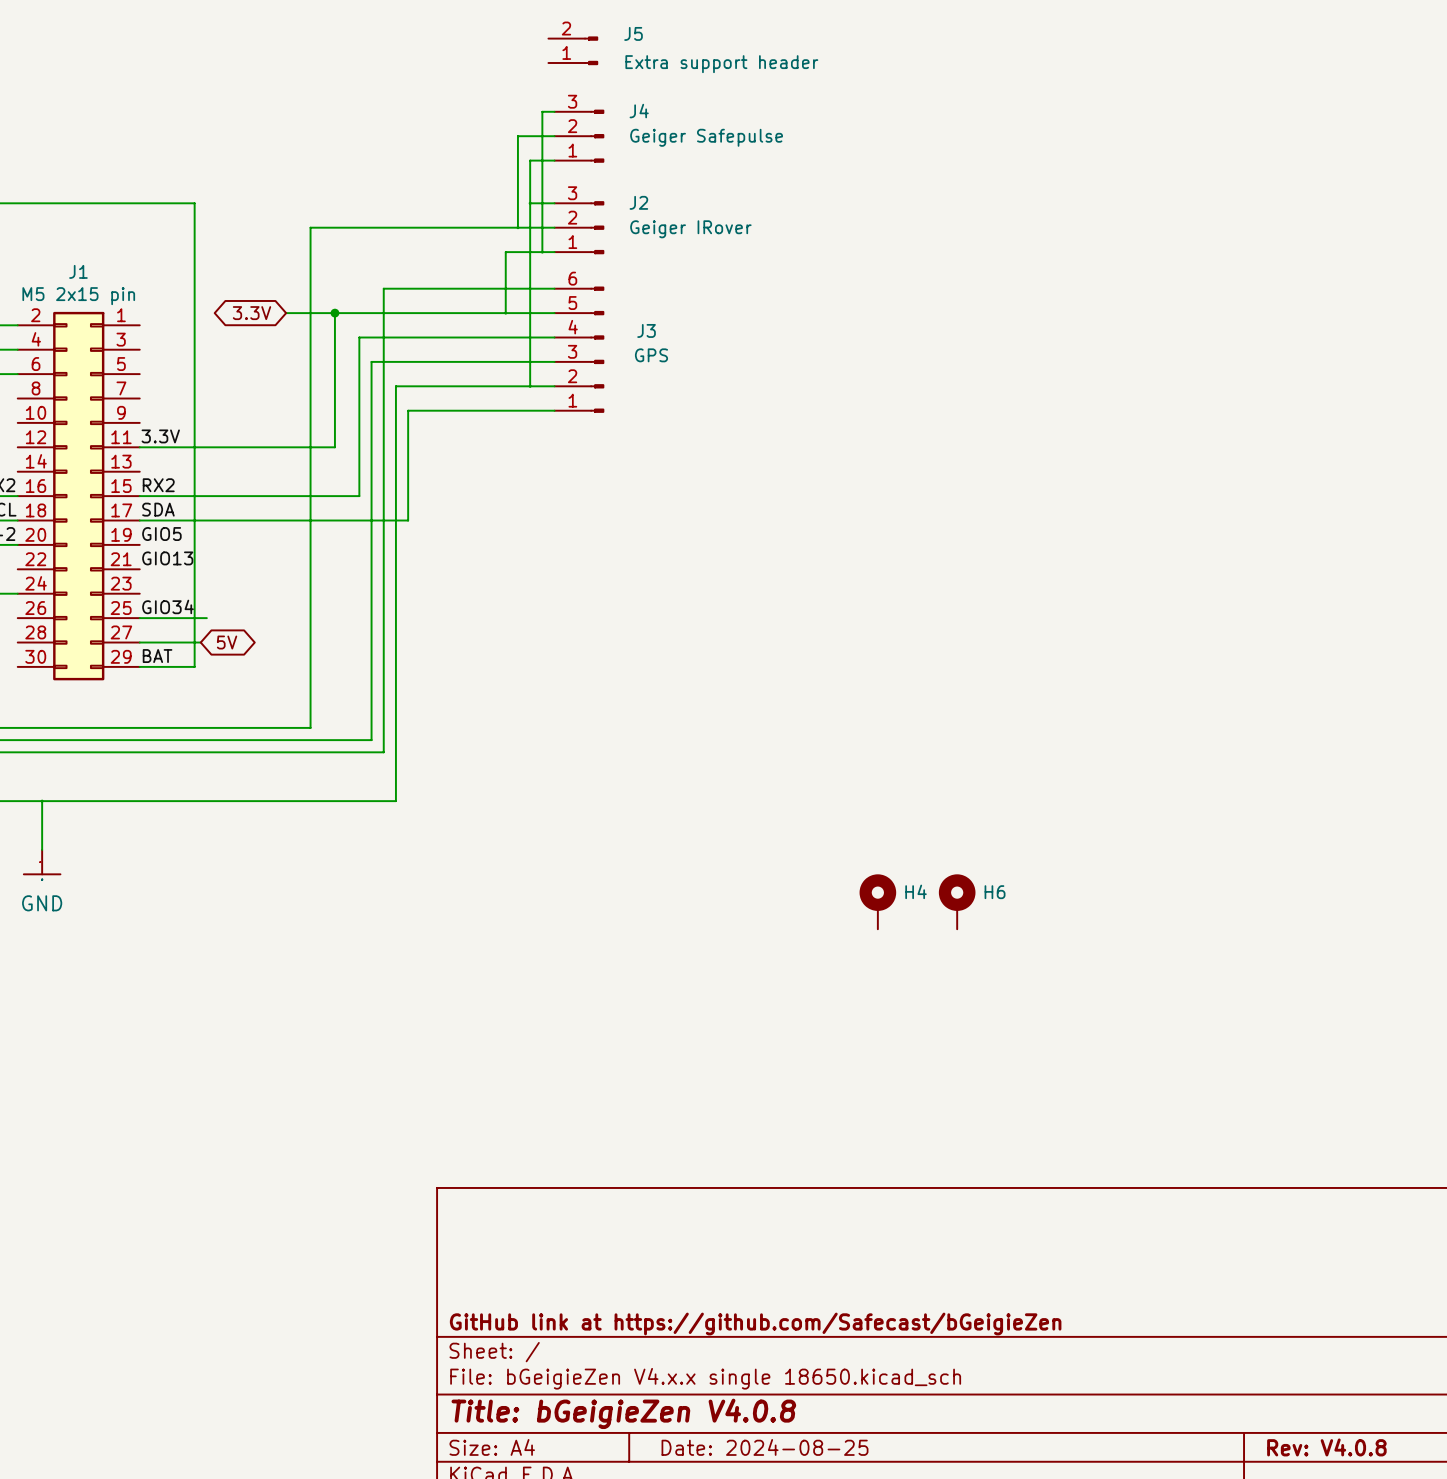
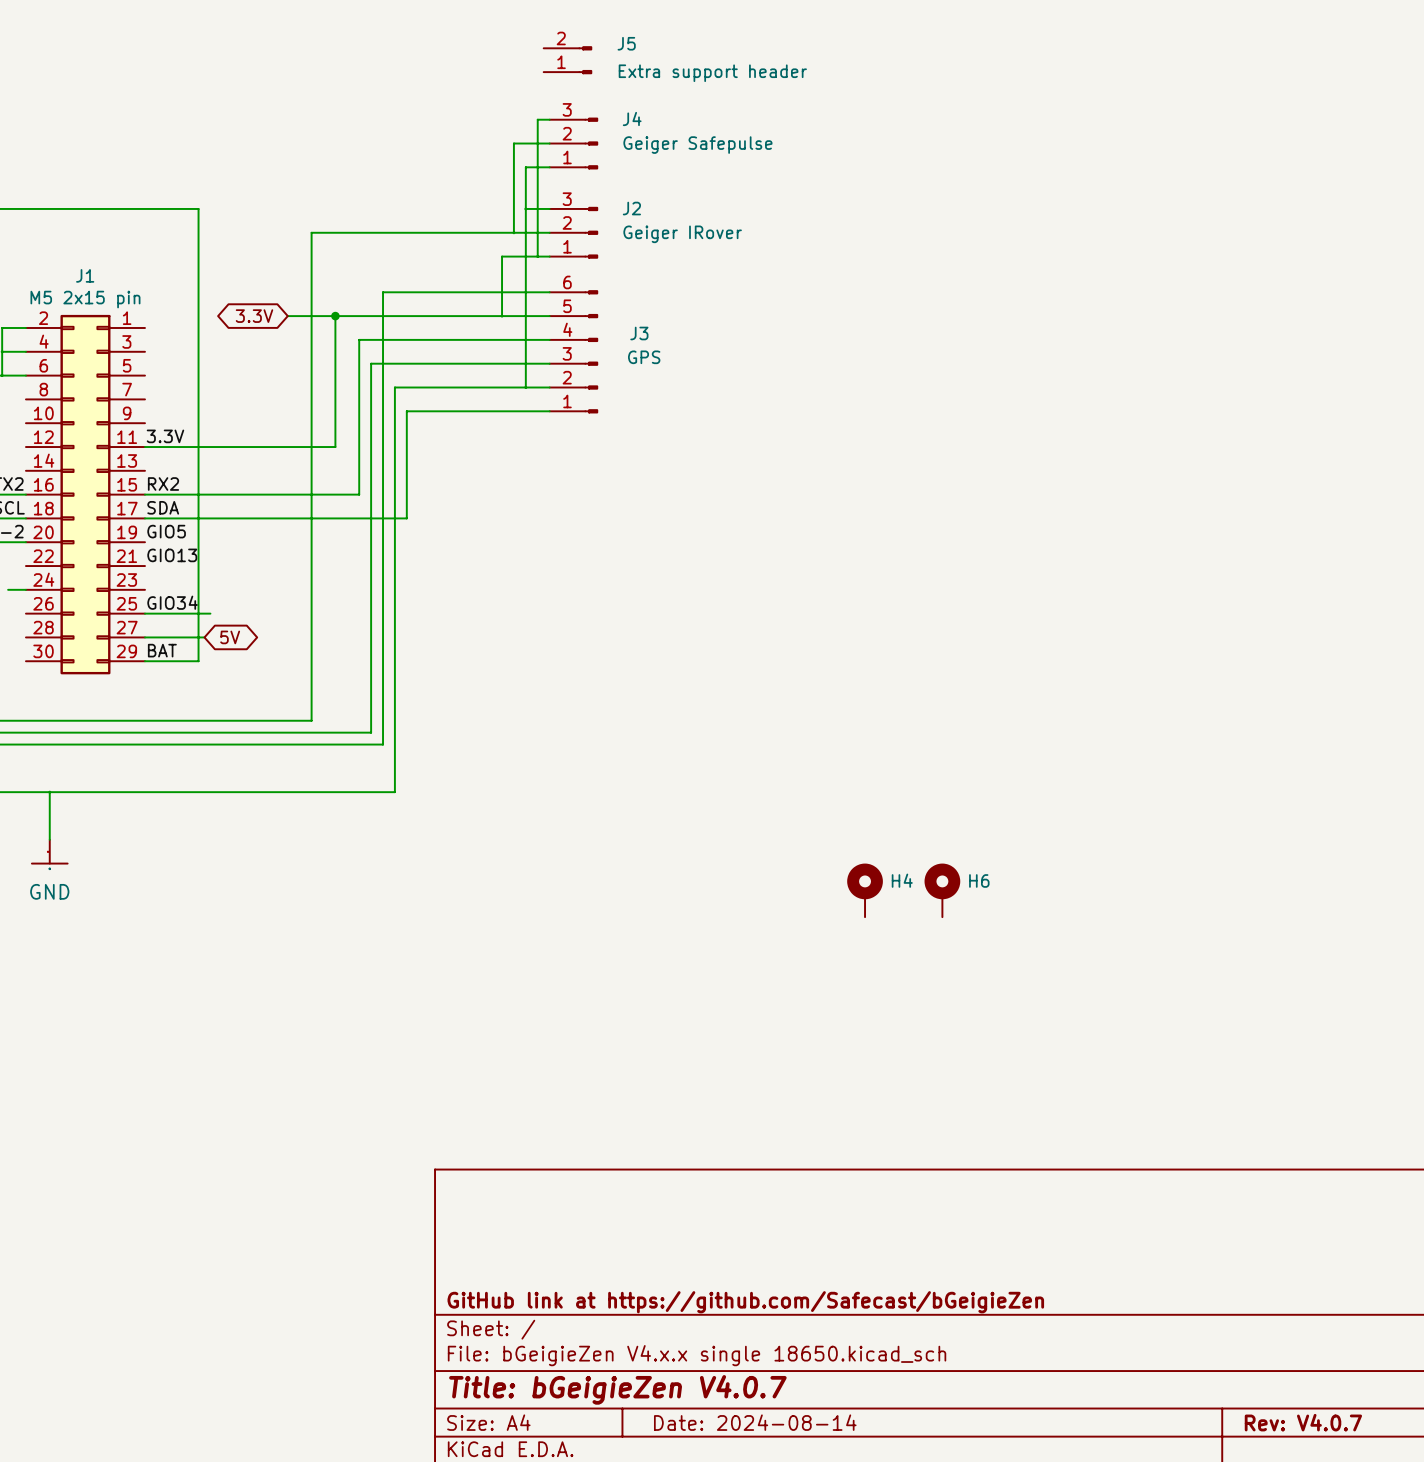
title block: Title: bGeigieZen V4.0.8 (623, 1413) -> Title: bGeigieZen V4.0.7 (617, 1389)
title block: Date: 2024-08-25 (765, 1447) -> Date: 2024-08-14 (755, 1422)
title block: Rev: V4.0.8 (1326, 1447) -> Rev: V4.0.7 (1303, 1422)

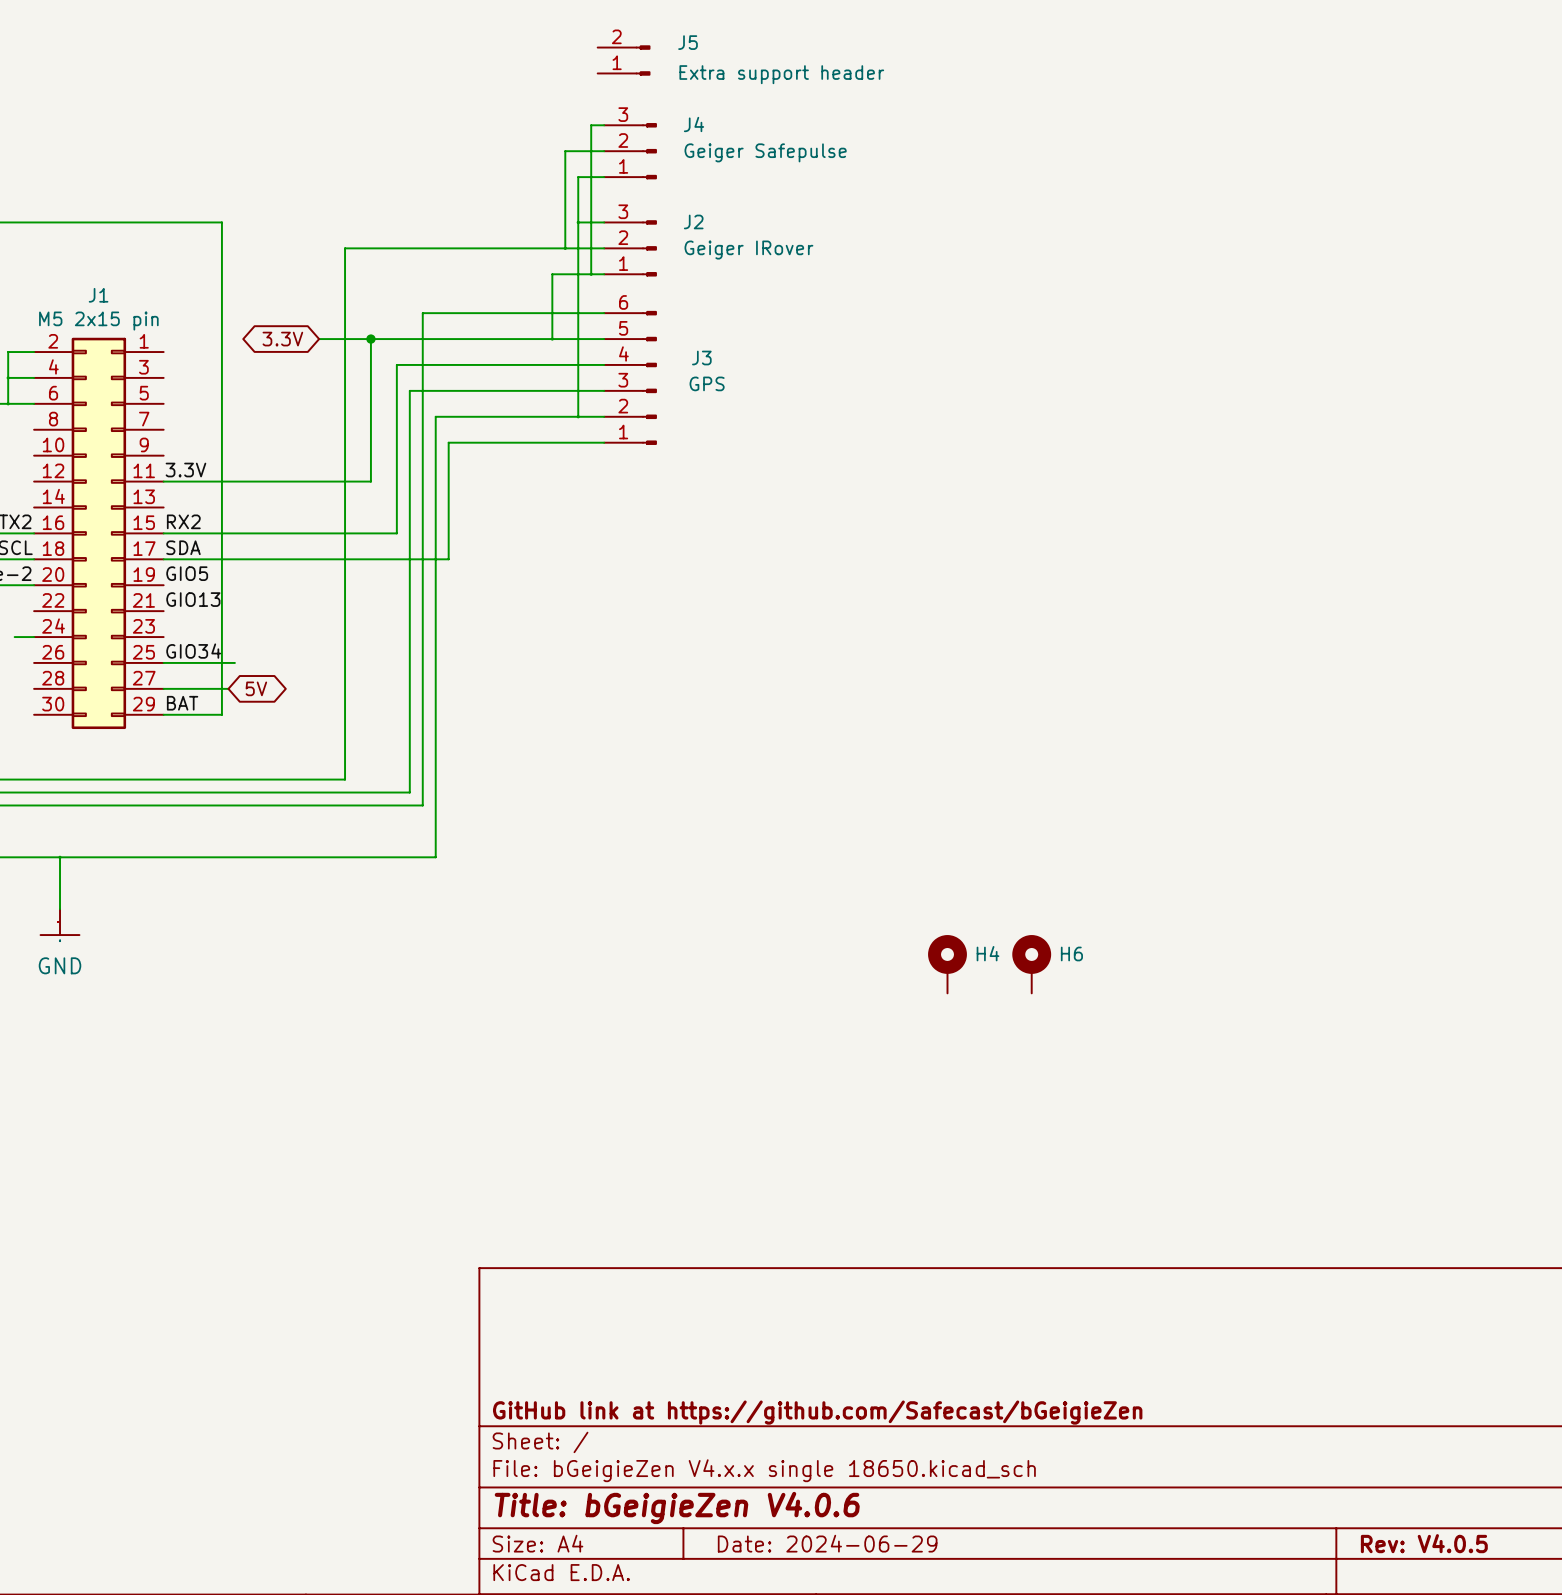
title block: Title: bGeigieZen V4.0.7 (617, 1389) -> Title: bGeigieZen V4.0.6 (677, 1507)
title block: Date: 2024-08-14 (755, 1422) -> Date: 2024-06-29 (827, 1543)
title block: Rev: V4.0.7 (1303, 1422) -> Rev: V4.0.5 (1424, 1543)

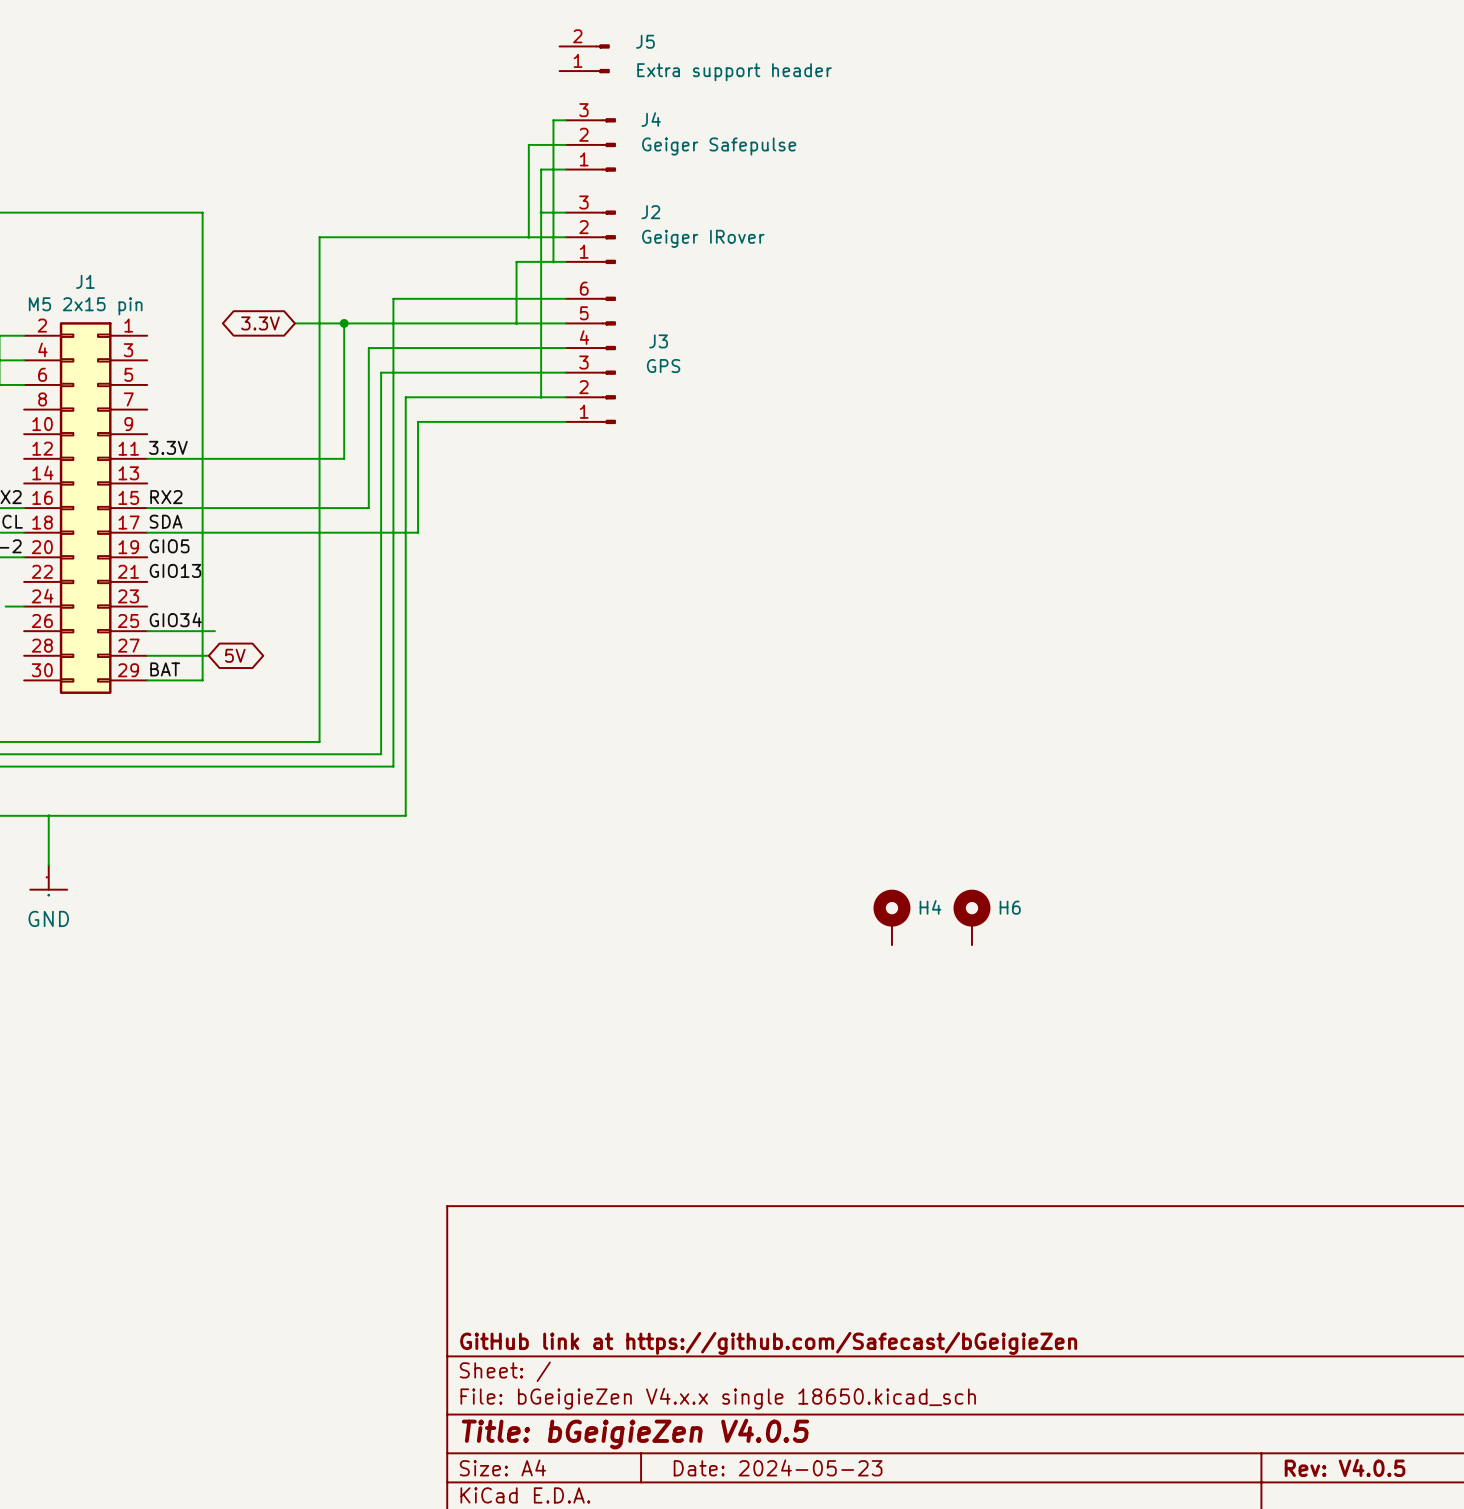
title block: Title: bGeigieZen V4.0.6 (677, 1507) -> Title: bGeigieZen V4.0.5 (635, 1434)
title block: Date: 2024-06-29 (827, 1543) -> Date: 2024-05-23 (778, 1467)

